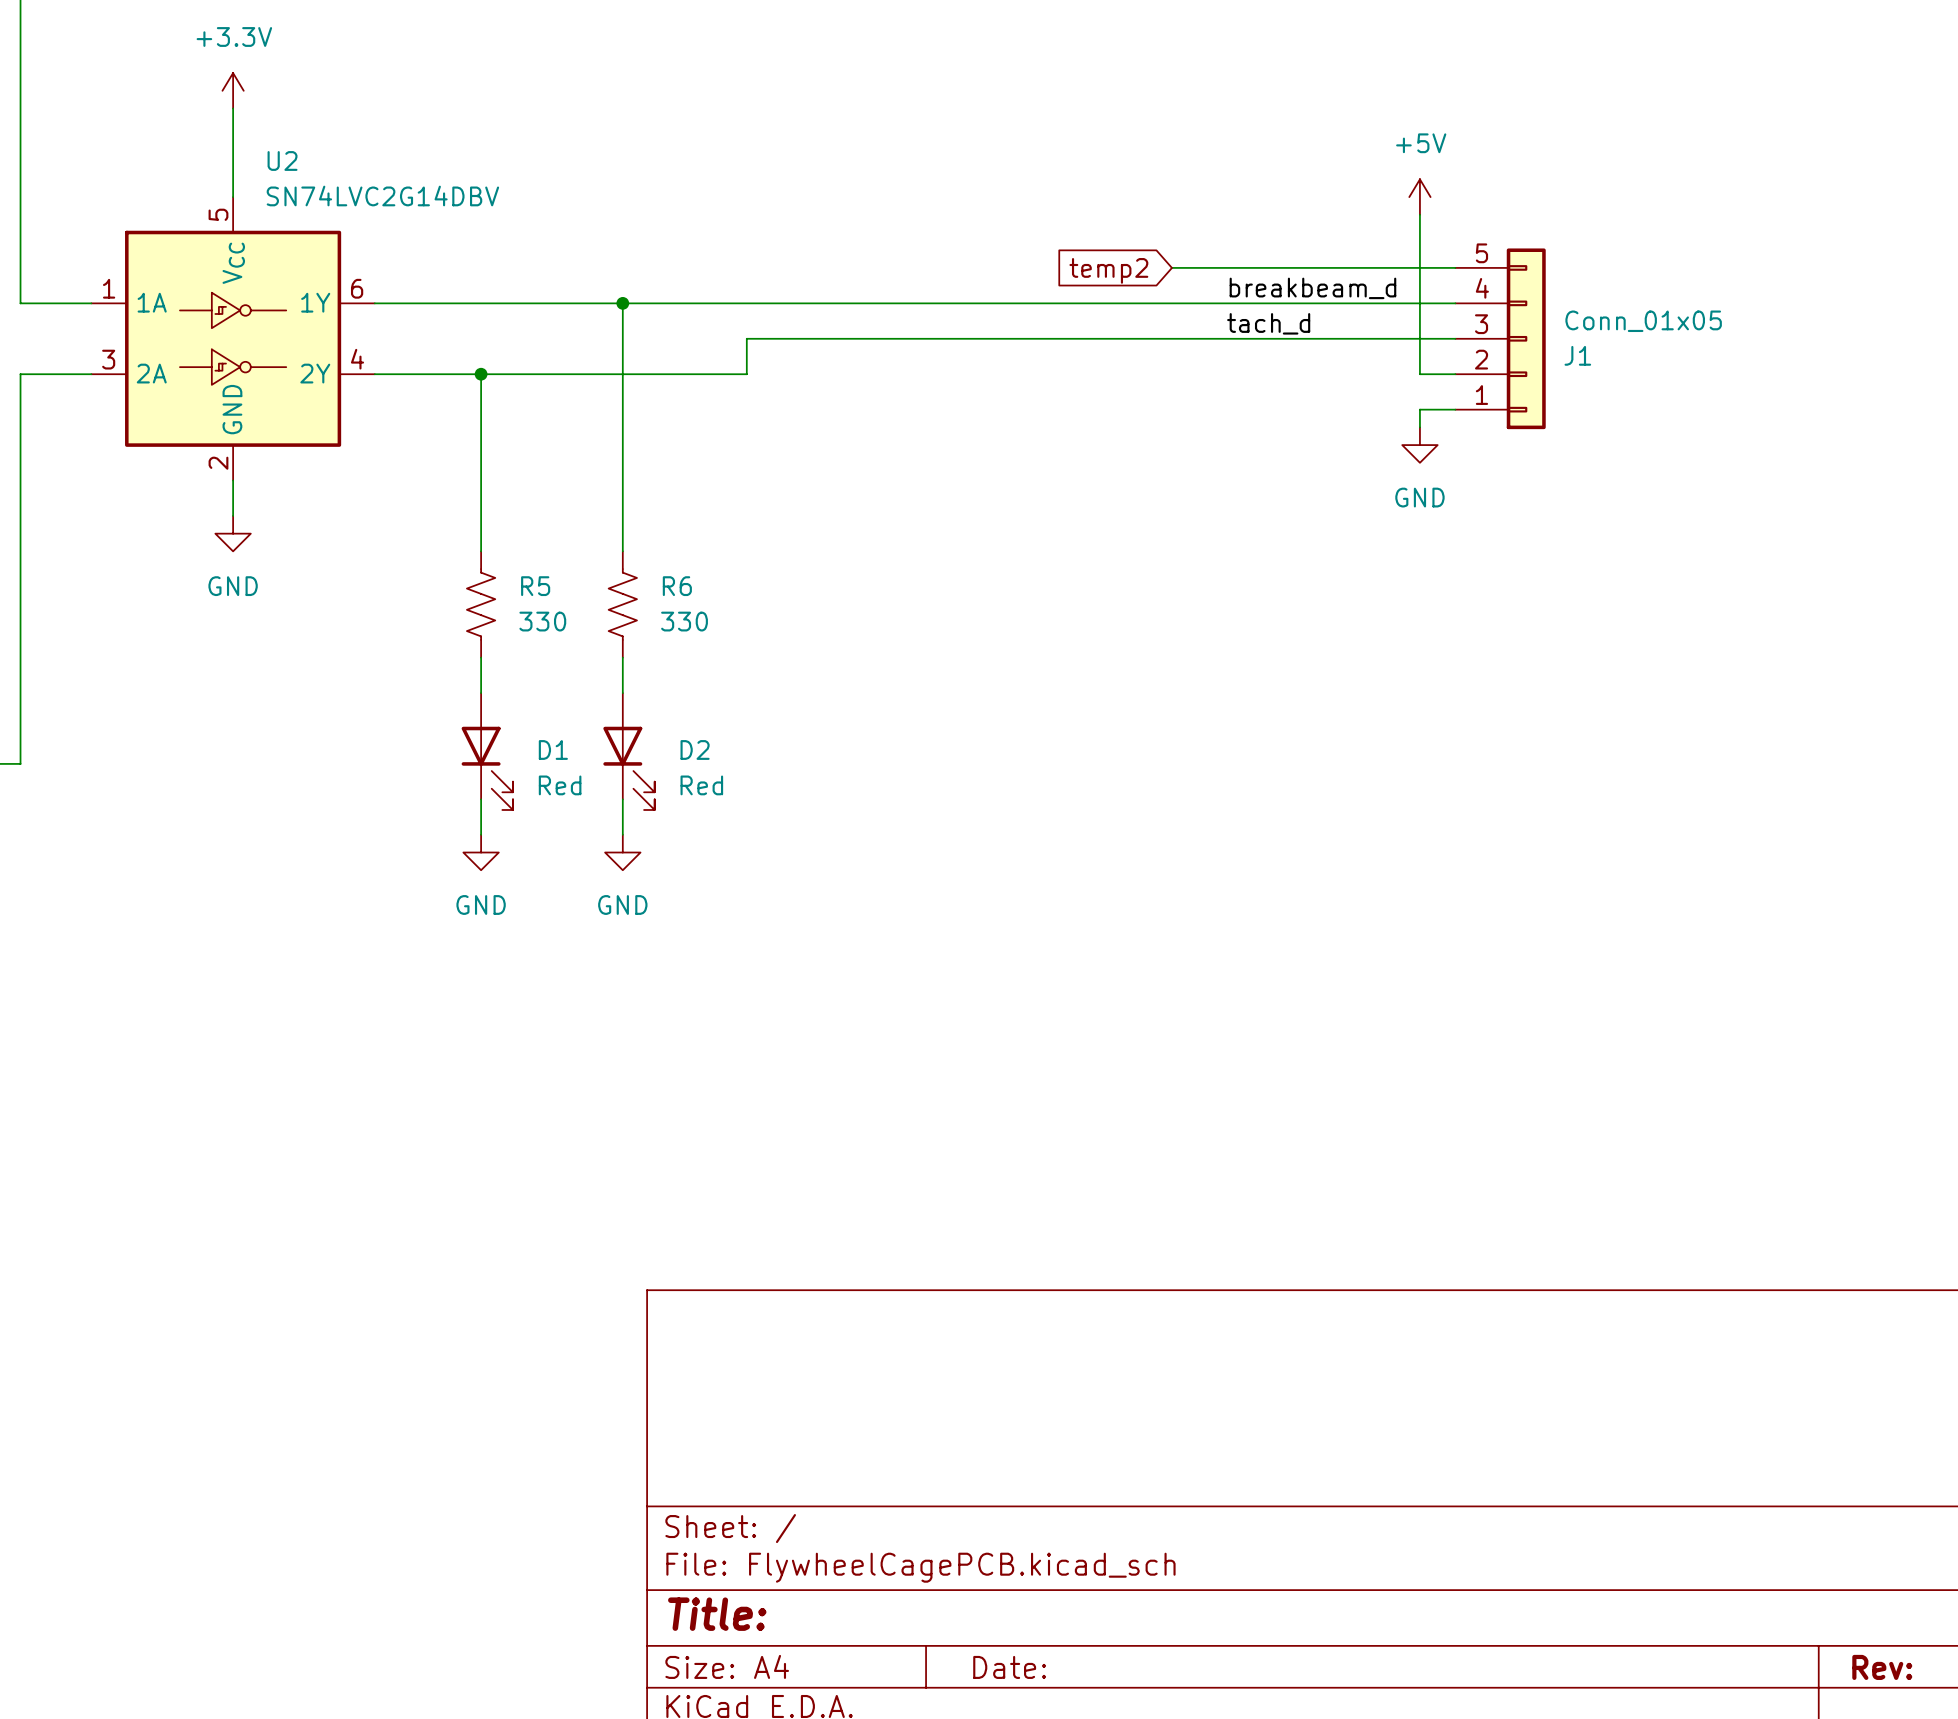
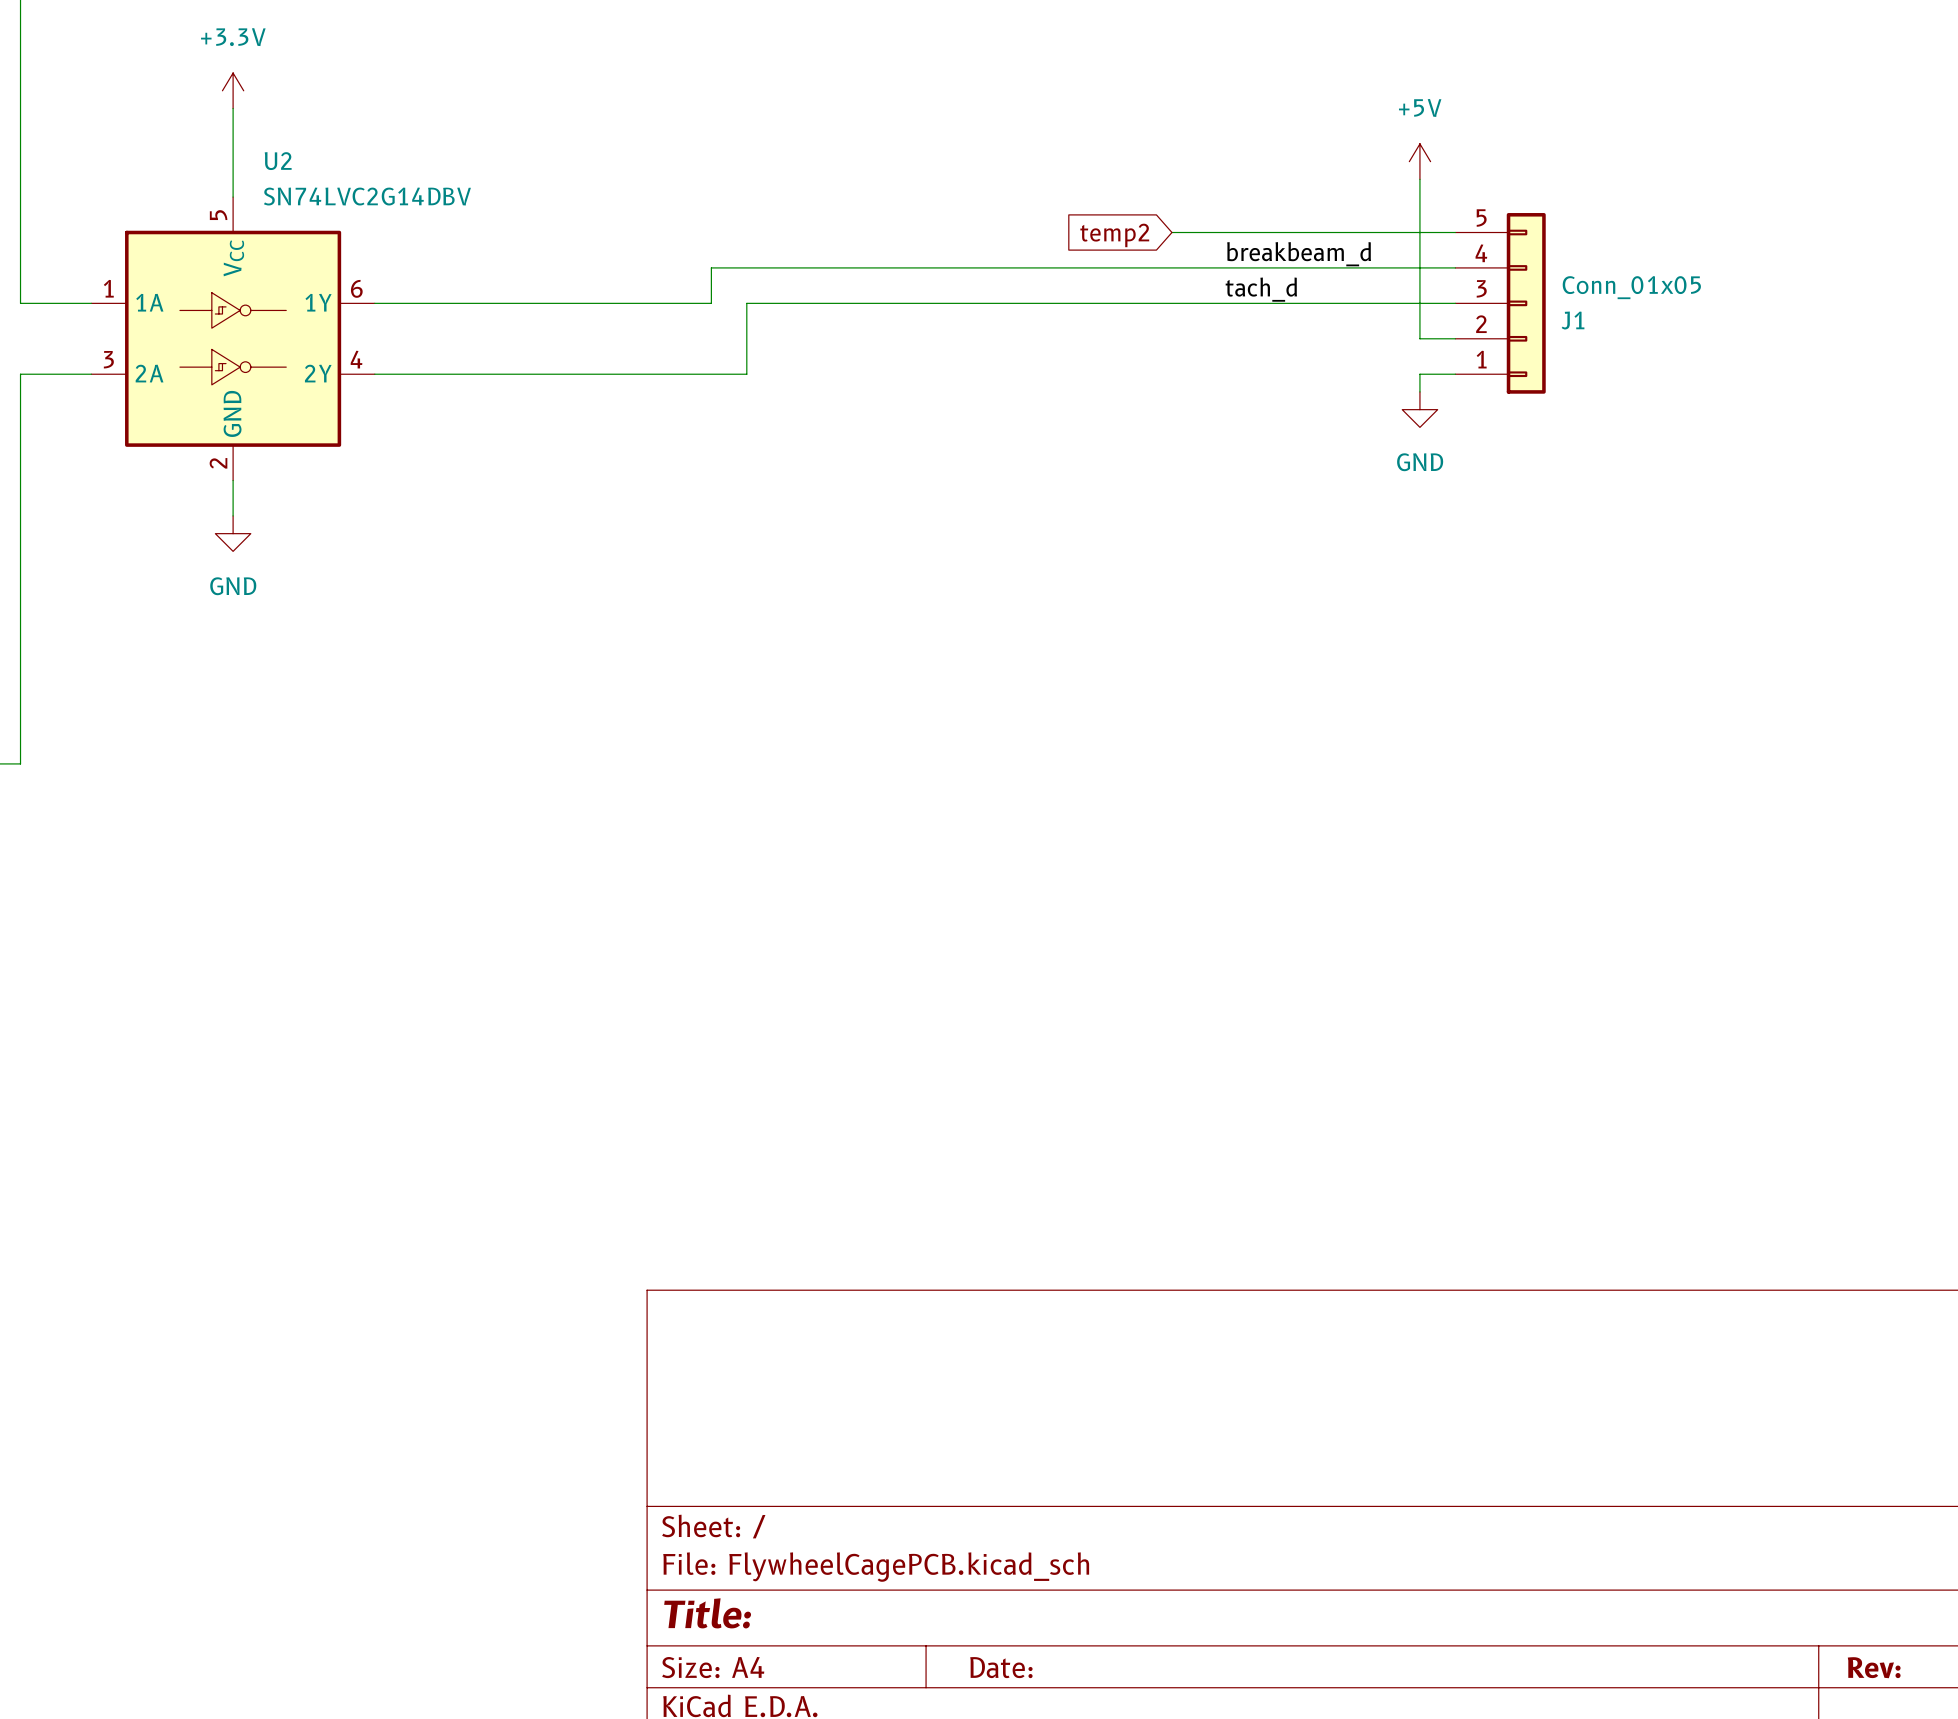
power symbol position: +5V (1419, 197) -> +5V (1419, 161)
wire: none -> (1171, 232) (1455, 232)
label: none -> breakbeam_d (1299, 254)
wire: none -> (1171, 267) (711, 267) (711, 303)
global label position: temp2 (1108, 270) -> temp2 (1114, 235)
label: breakbeam_d (1312, 288) -> tach_d (1261, 289)
wire: (622, 303) (622, 551) -> none
junction: (622, 303) -> none
wire: (711, 303) (746, 303) -> (746, 338) (746, 303)
label: tach_d (1268, 323) -> none
wire: (746, 338) (1419, 338) (1419, 374) -> (1419, 391) (1419, 374)
J1 position: (1500, 338) -> (1500, 303)
wire: (481, 374) (481, 551) -> none
junction: (481, 374) -> none
wire: (1455, 409) (1419, 409) (1419, 427) -> none
power symbol position: GND (1419, 445) -> GND (1419, 409)
R5: 330 (481, 604) -> none
R6: 330 (622, 604) -> none
wire: (481, 657) (481, 693) -> none
wire: (622, 657) (622, 693) -> none
D1: Red (487, 751) -> none
D2: Red (629, 751) -> none
wire: (481, 799) (481, 834) -> none
wire: (622, 799) (622, 834) -> none
power symbol: GND (481, 852) -> none
power symbol: GND (622, 852) -> none

